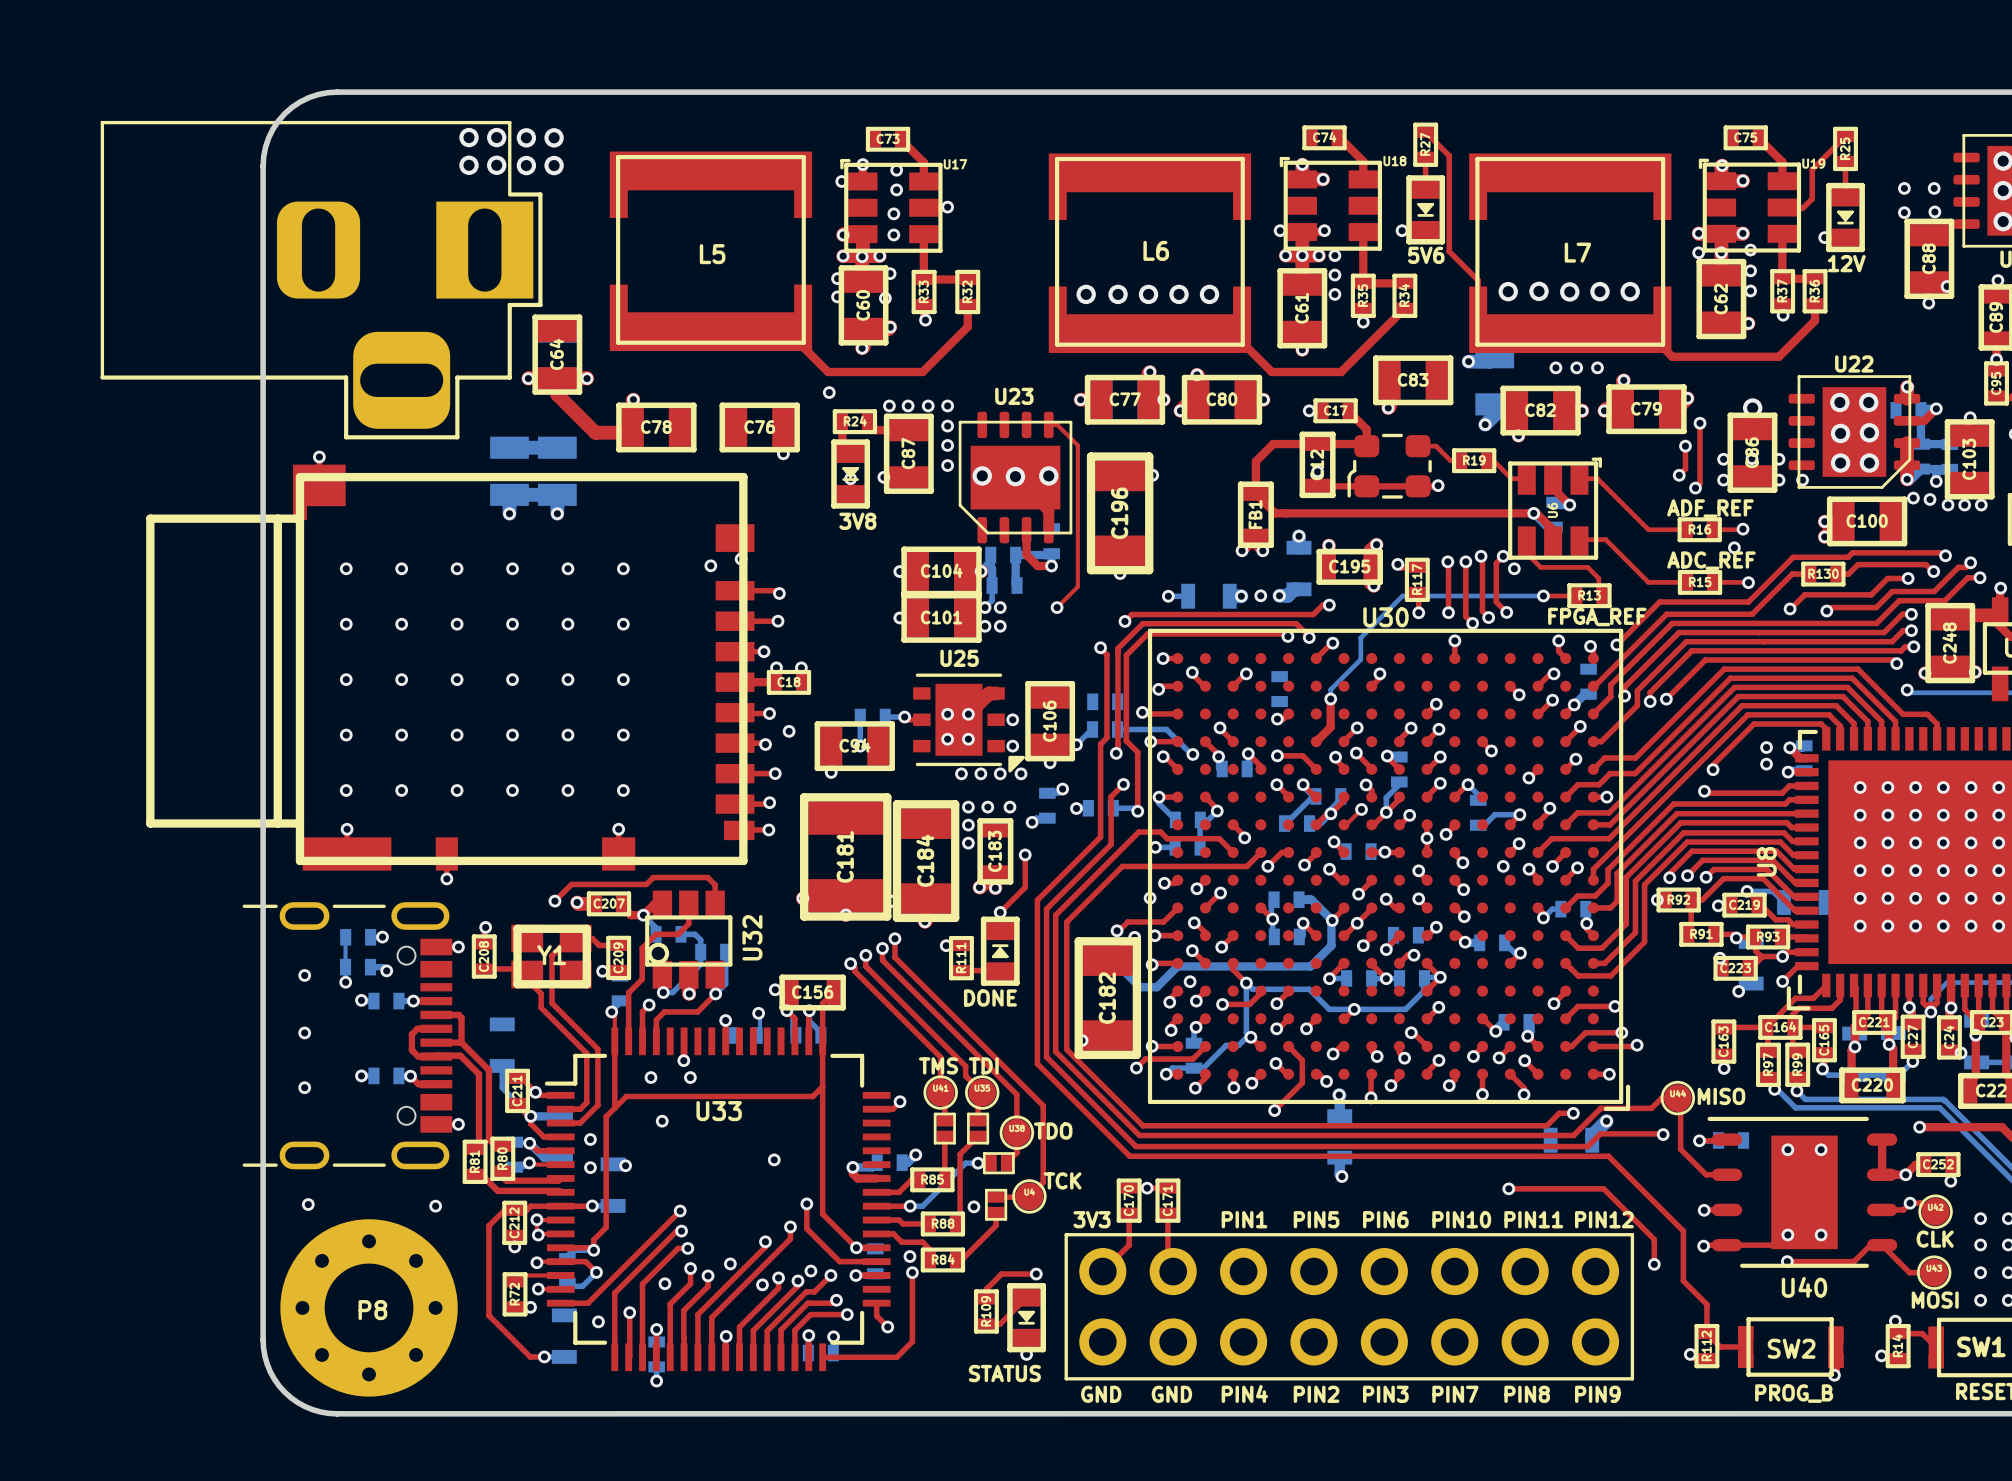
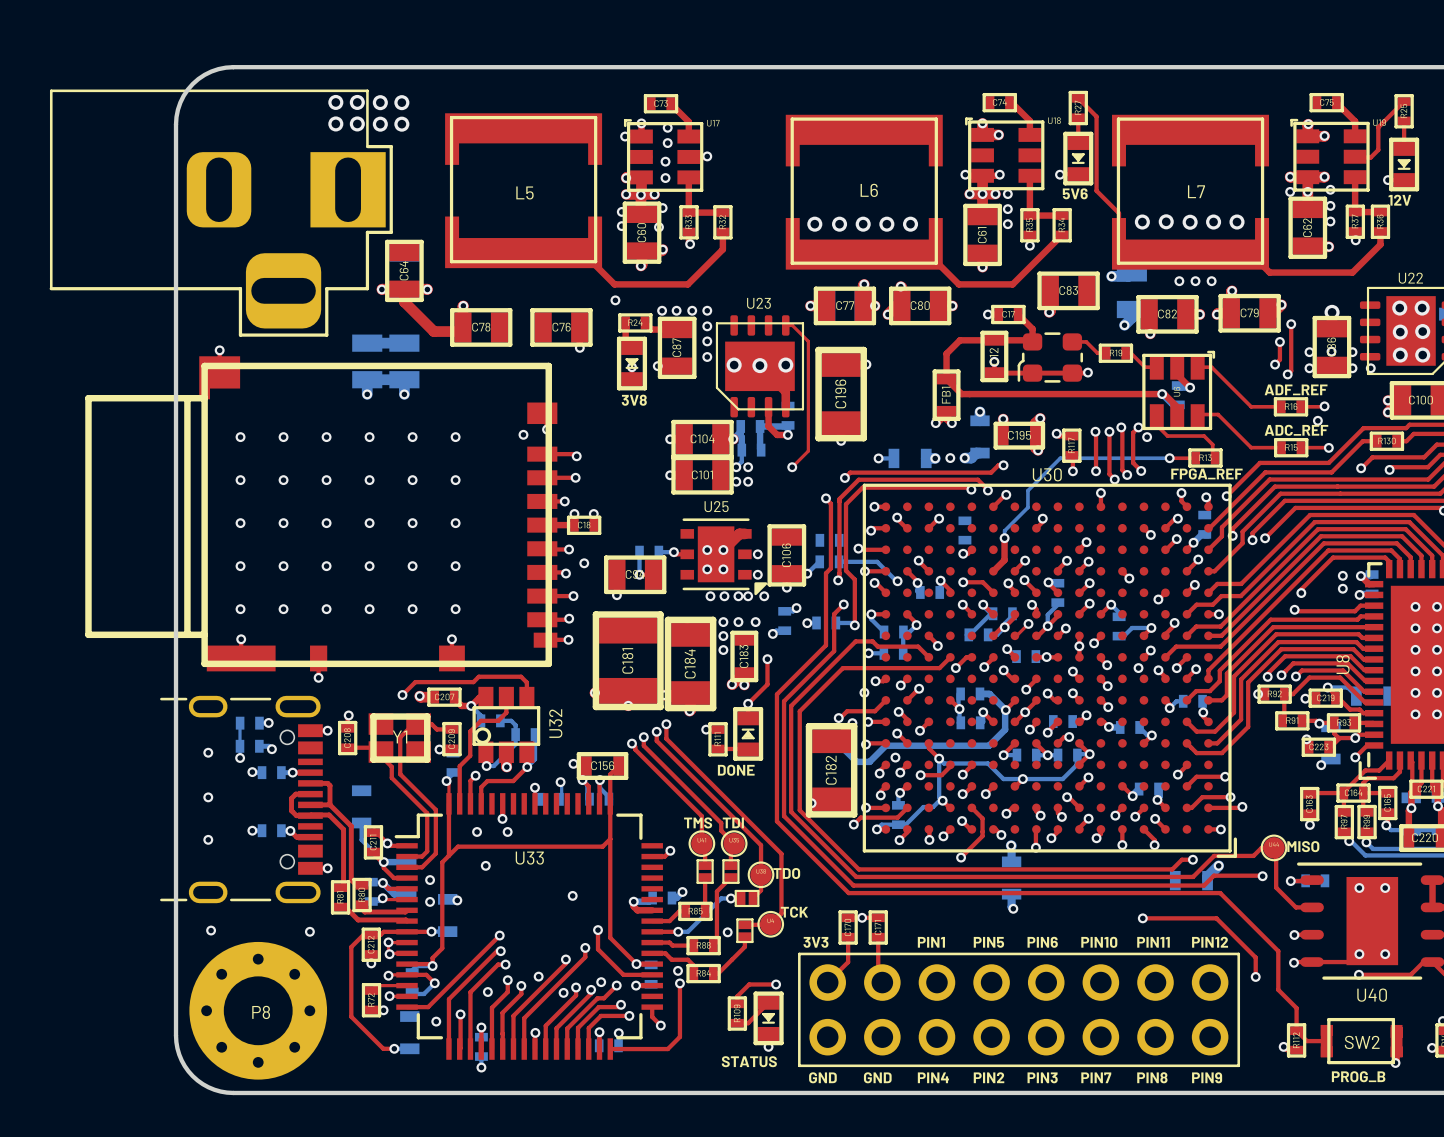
via: none -> (710, 596)
via: (961, 773) -> none
via: none -> (724, 596)
via: (980, 773) -> none
via: none -> (738, 596)

